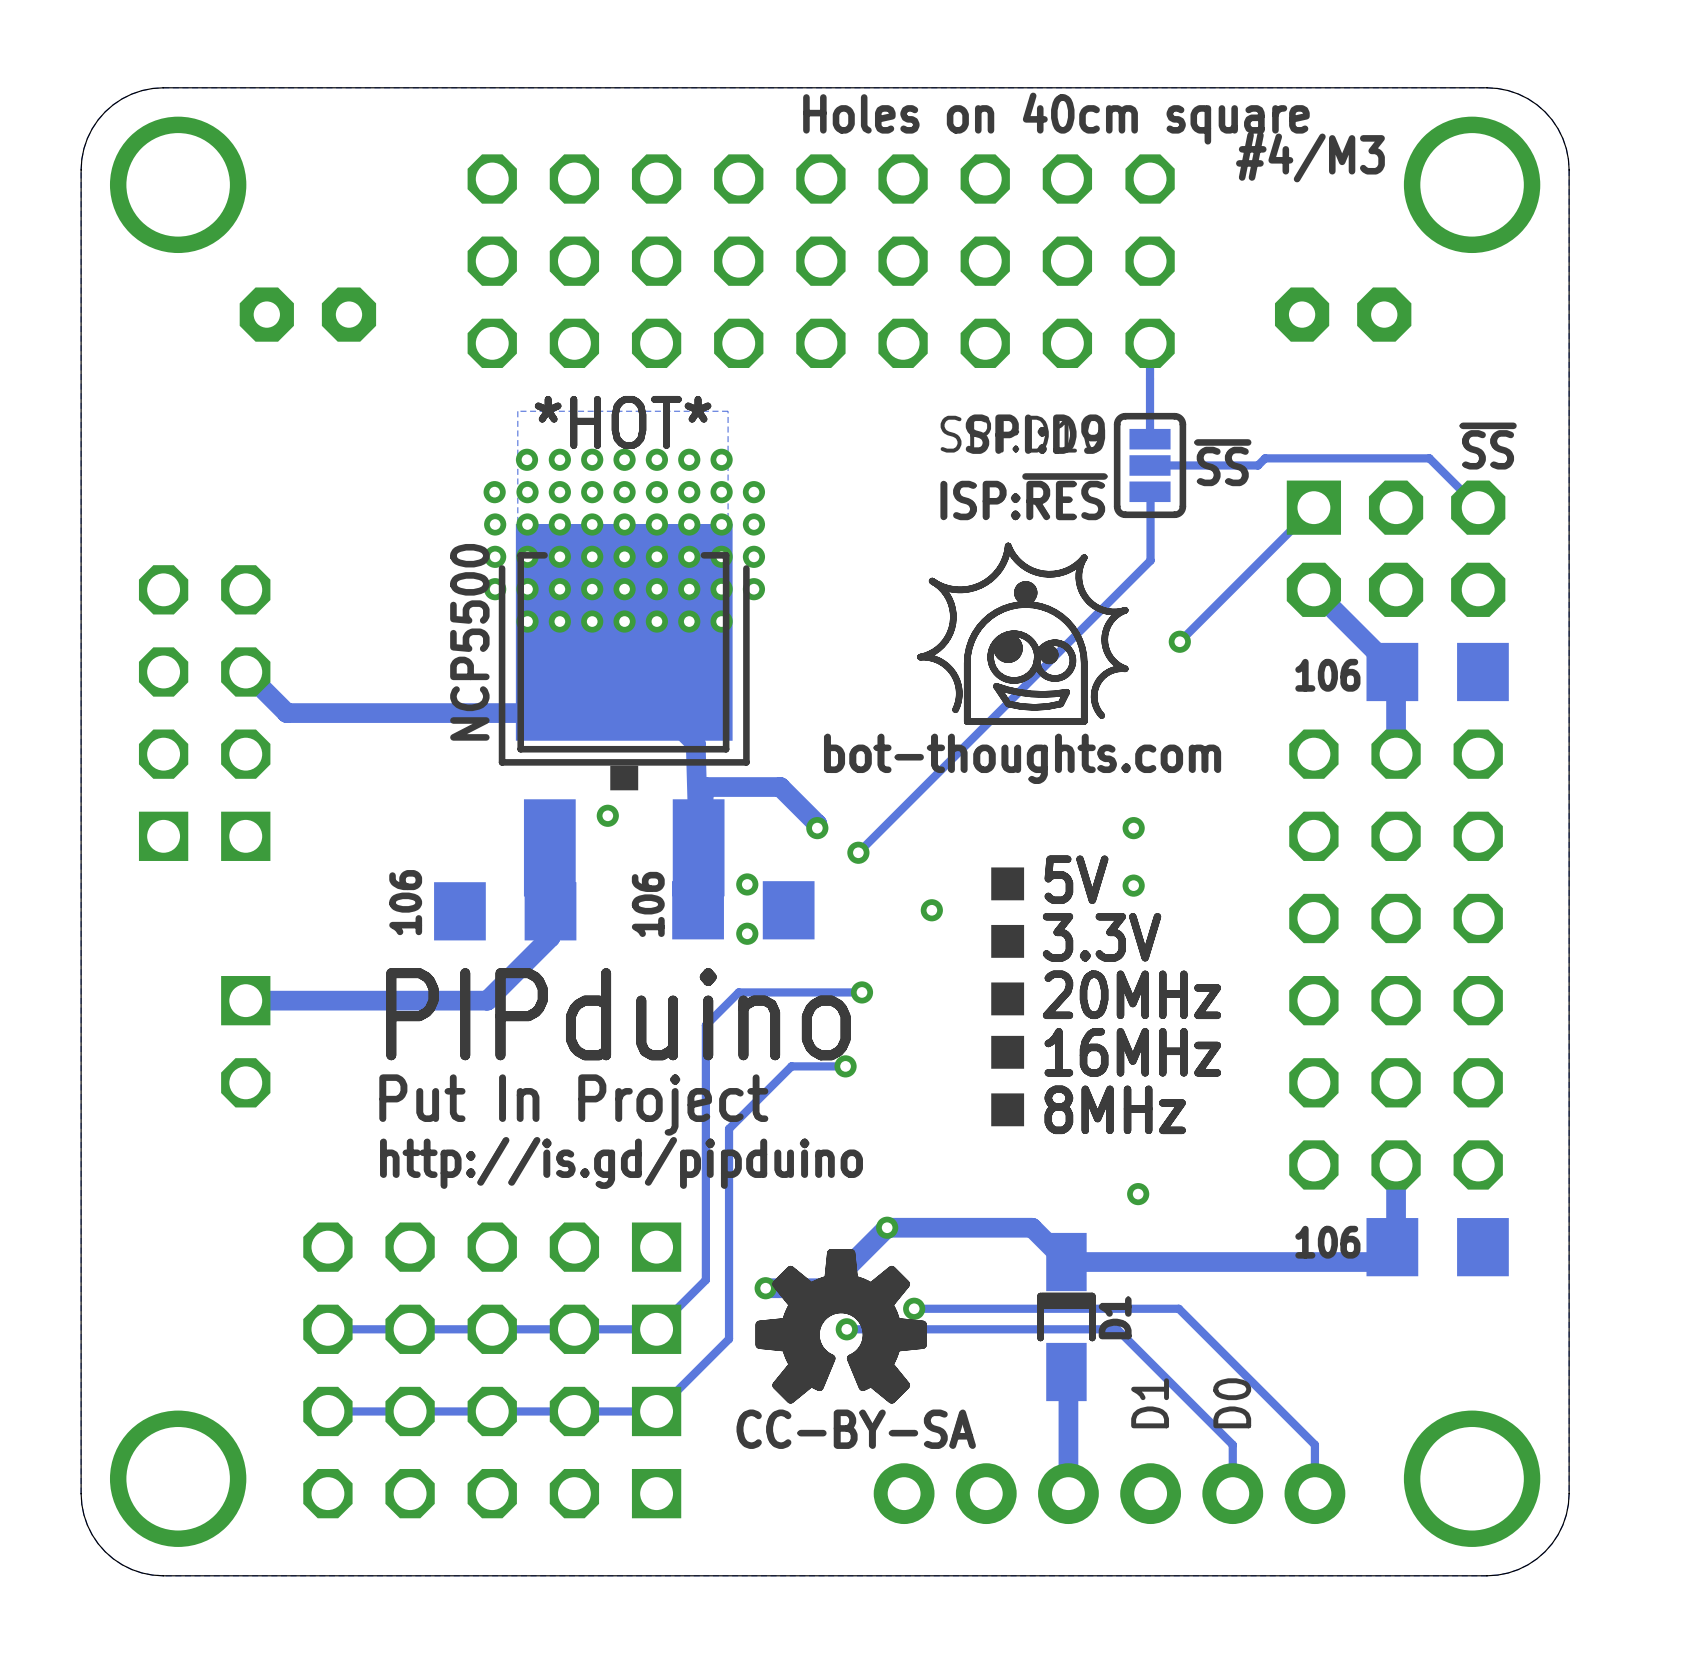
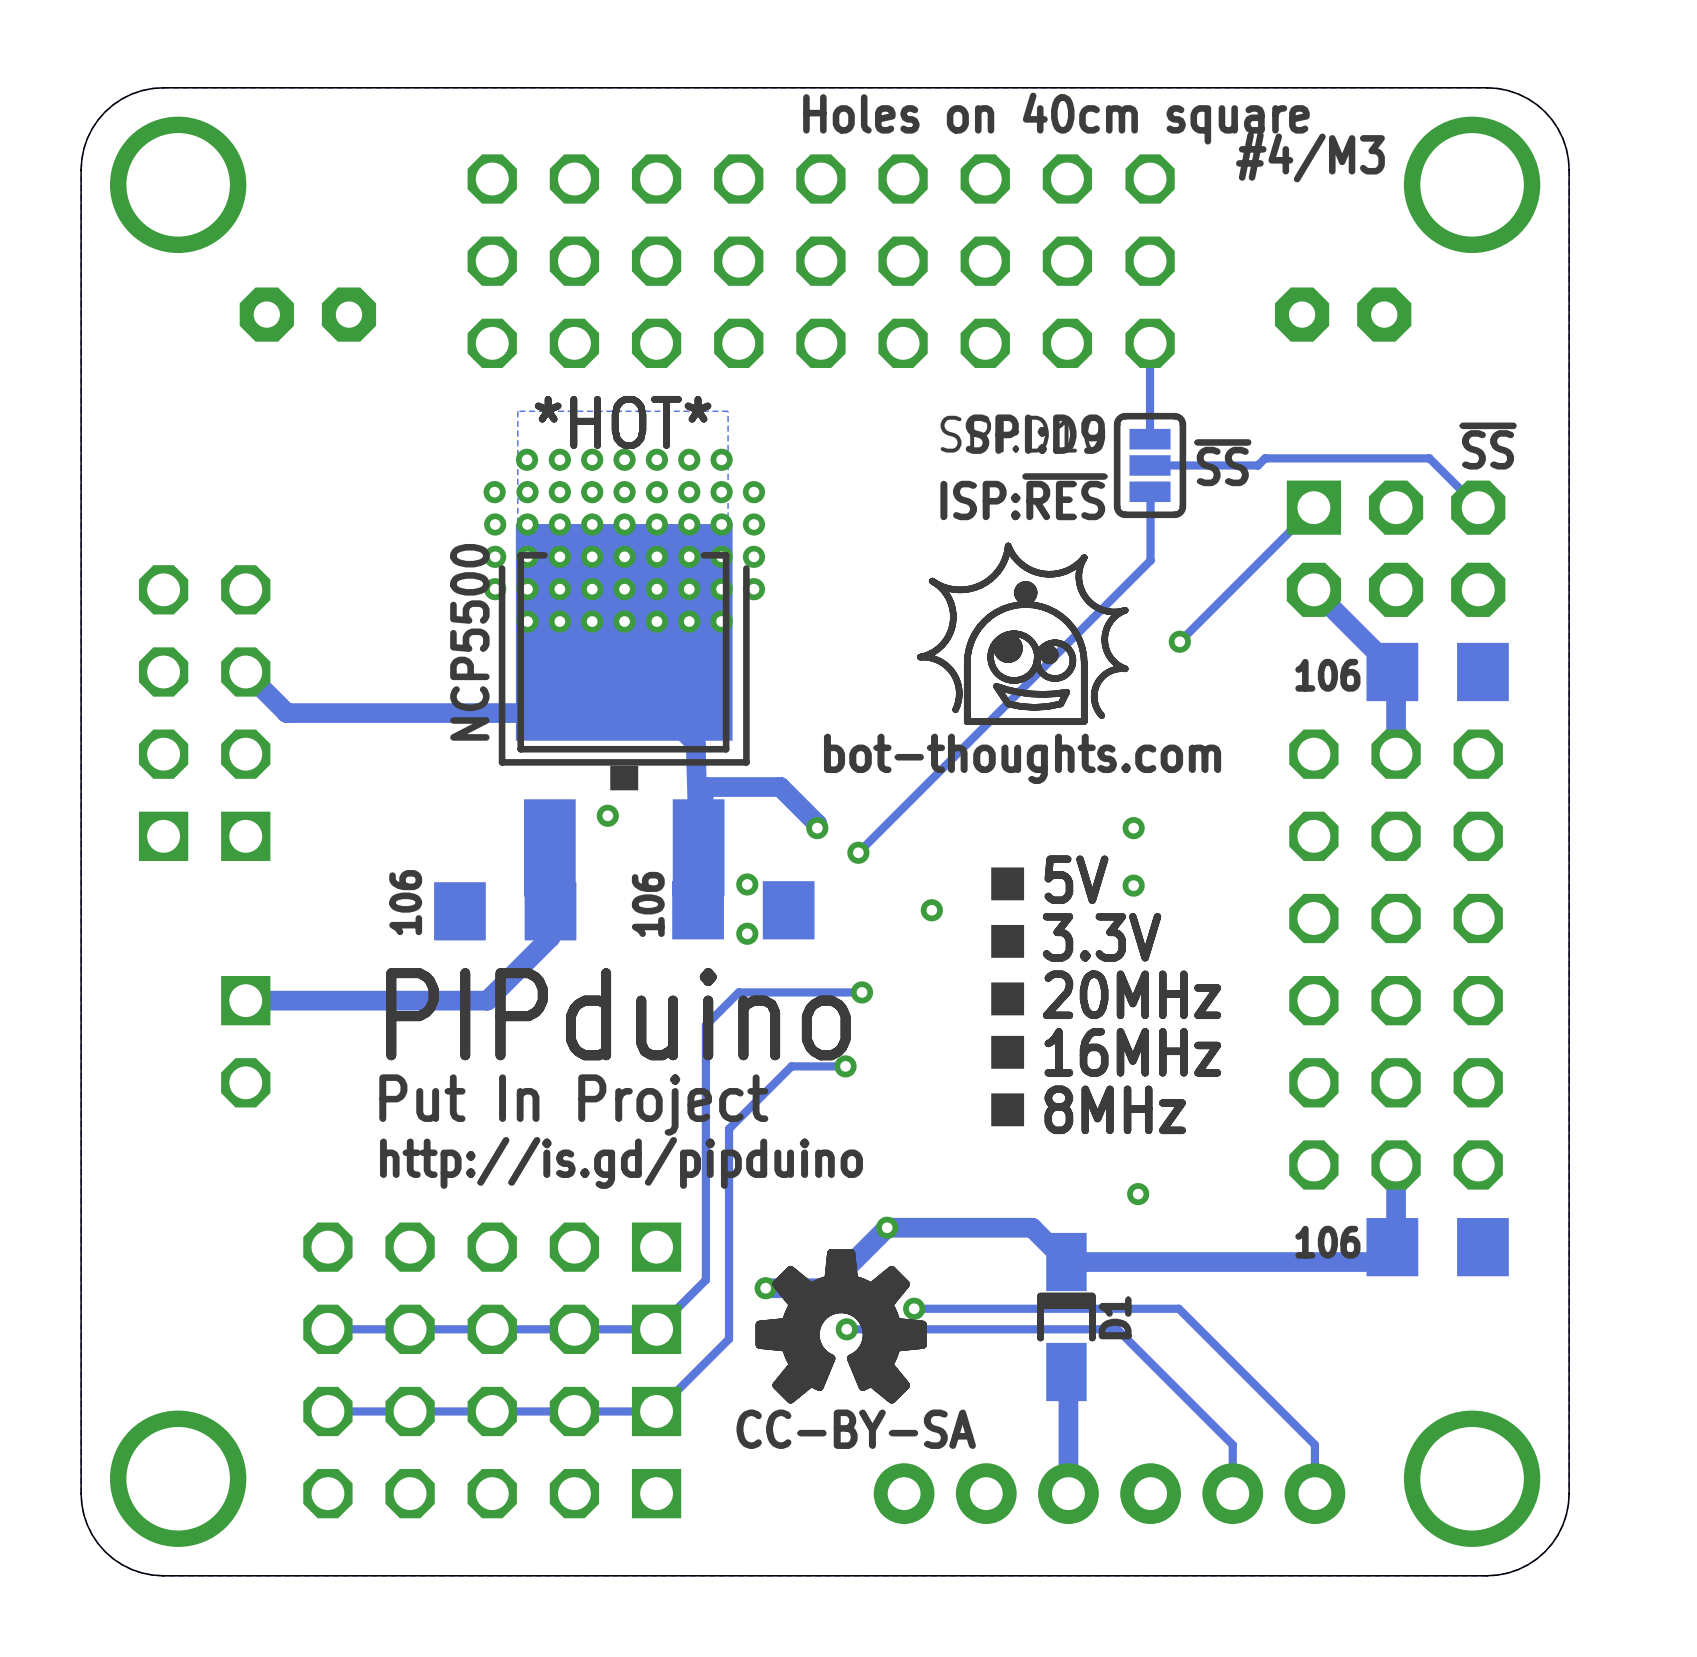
text: D1 (1150, 1403) -> none
text: D0 (1232, 1403) -> none

